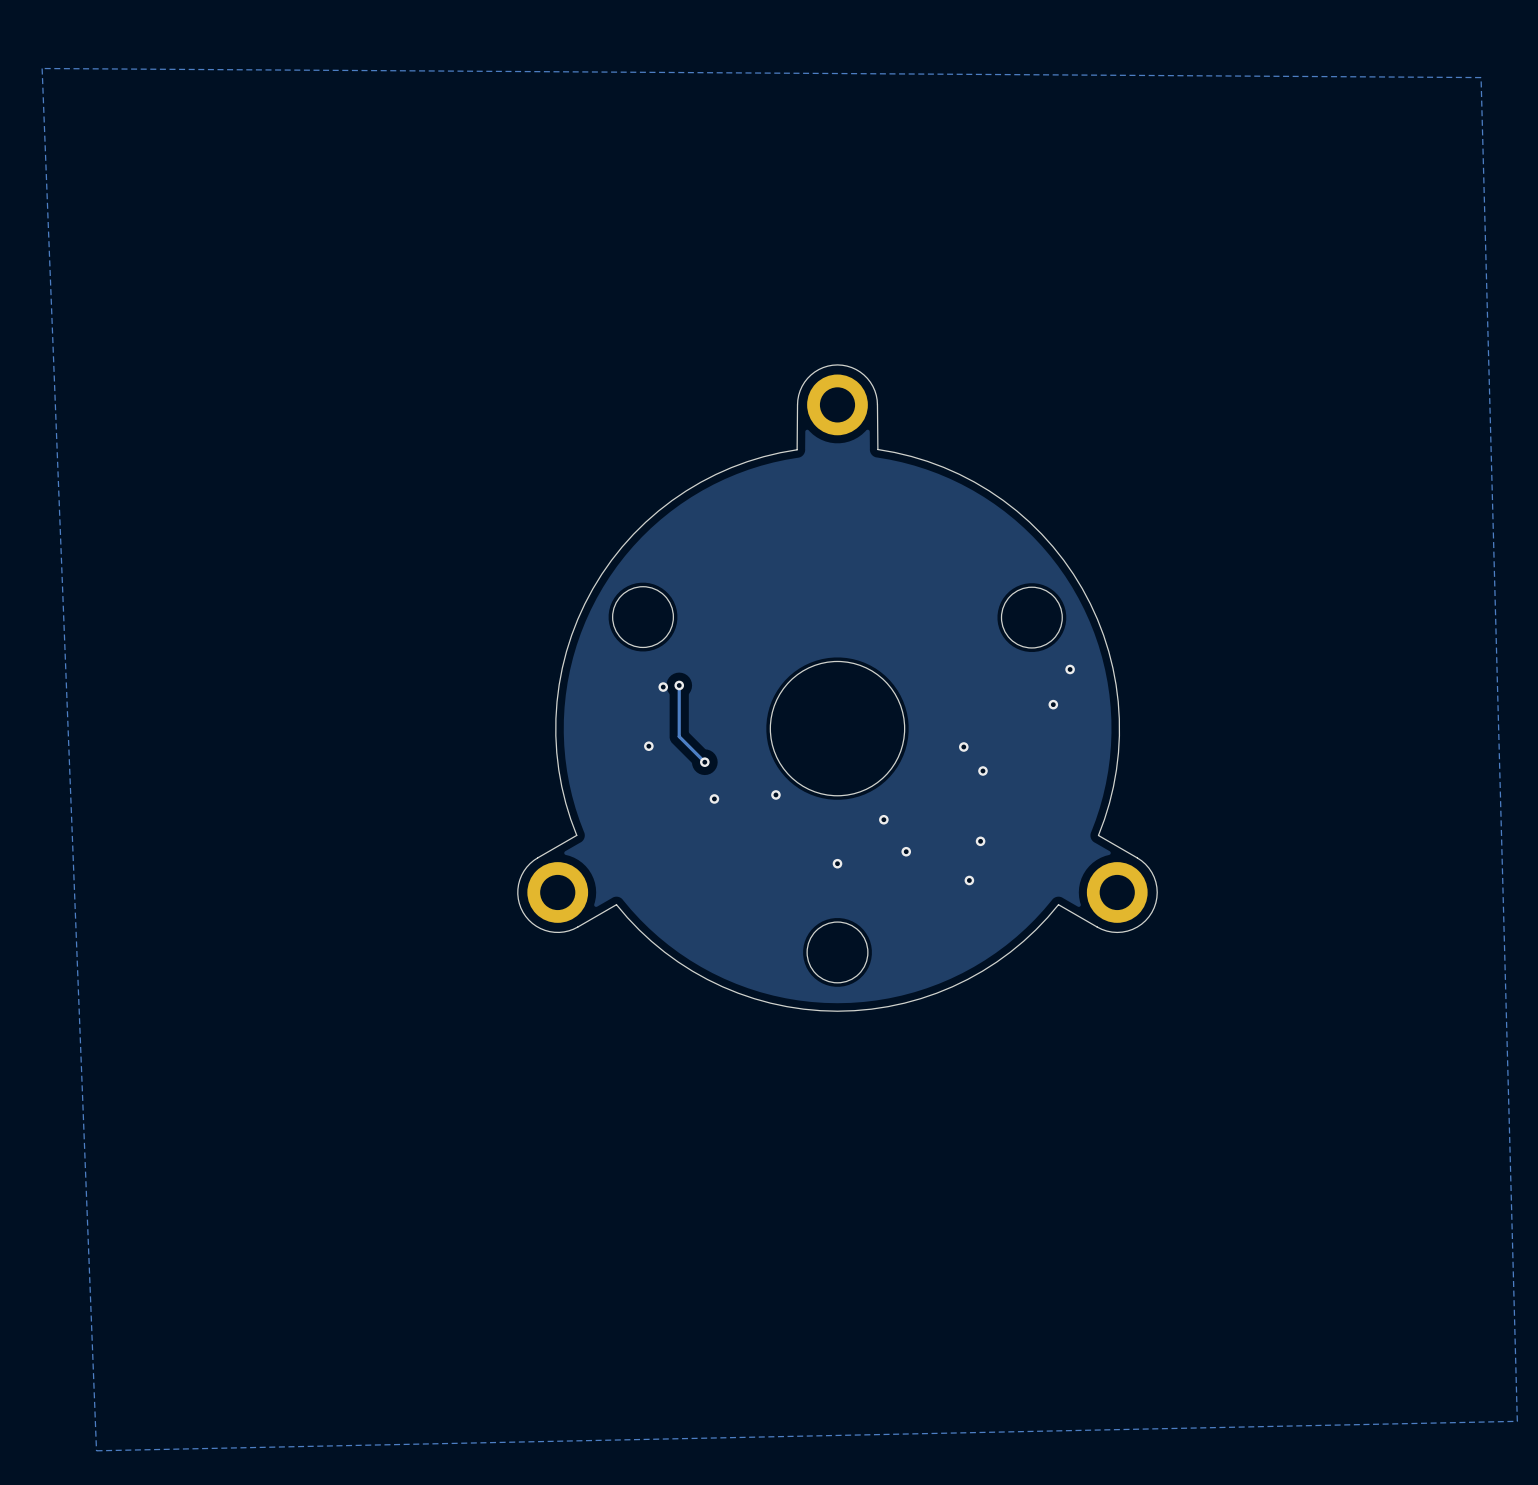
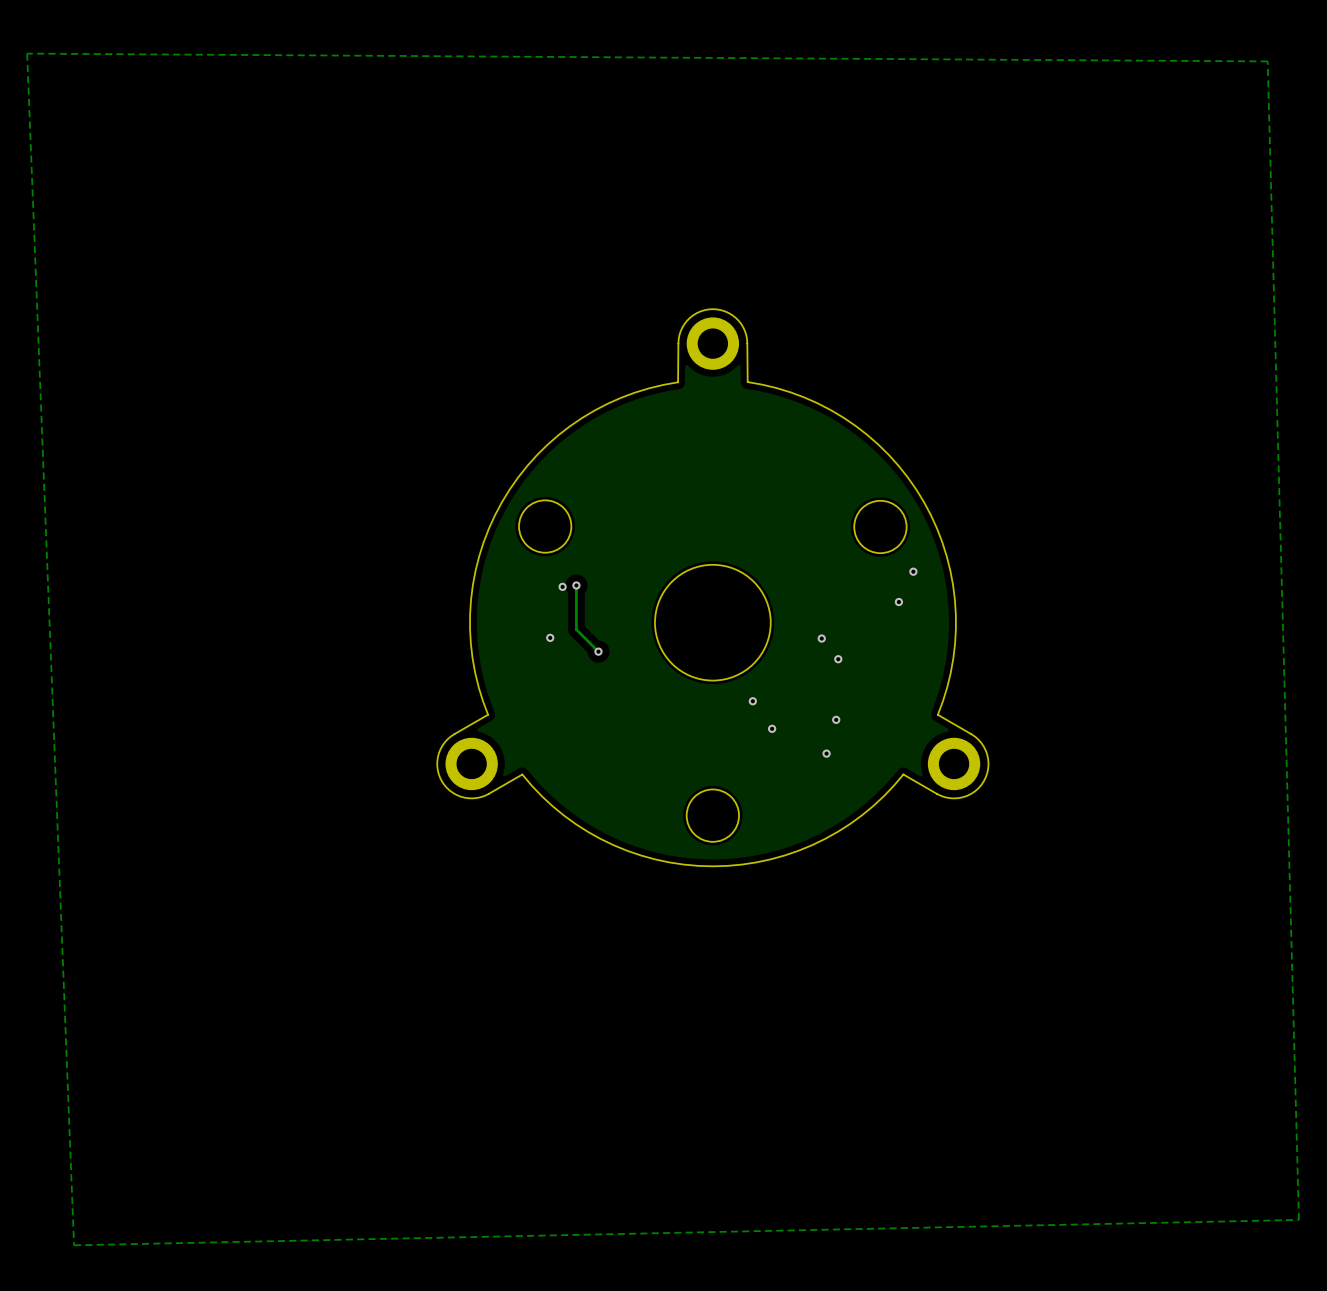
via: (775, 794) -> none
via: (714, 798) -> none
via: (837, 863) -> none

